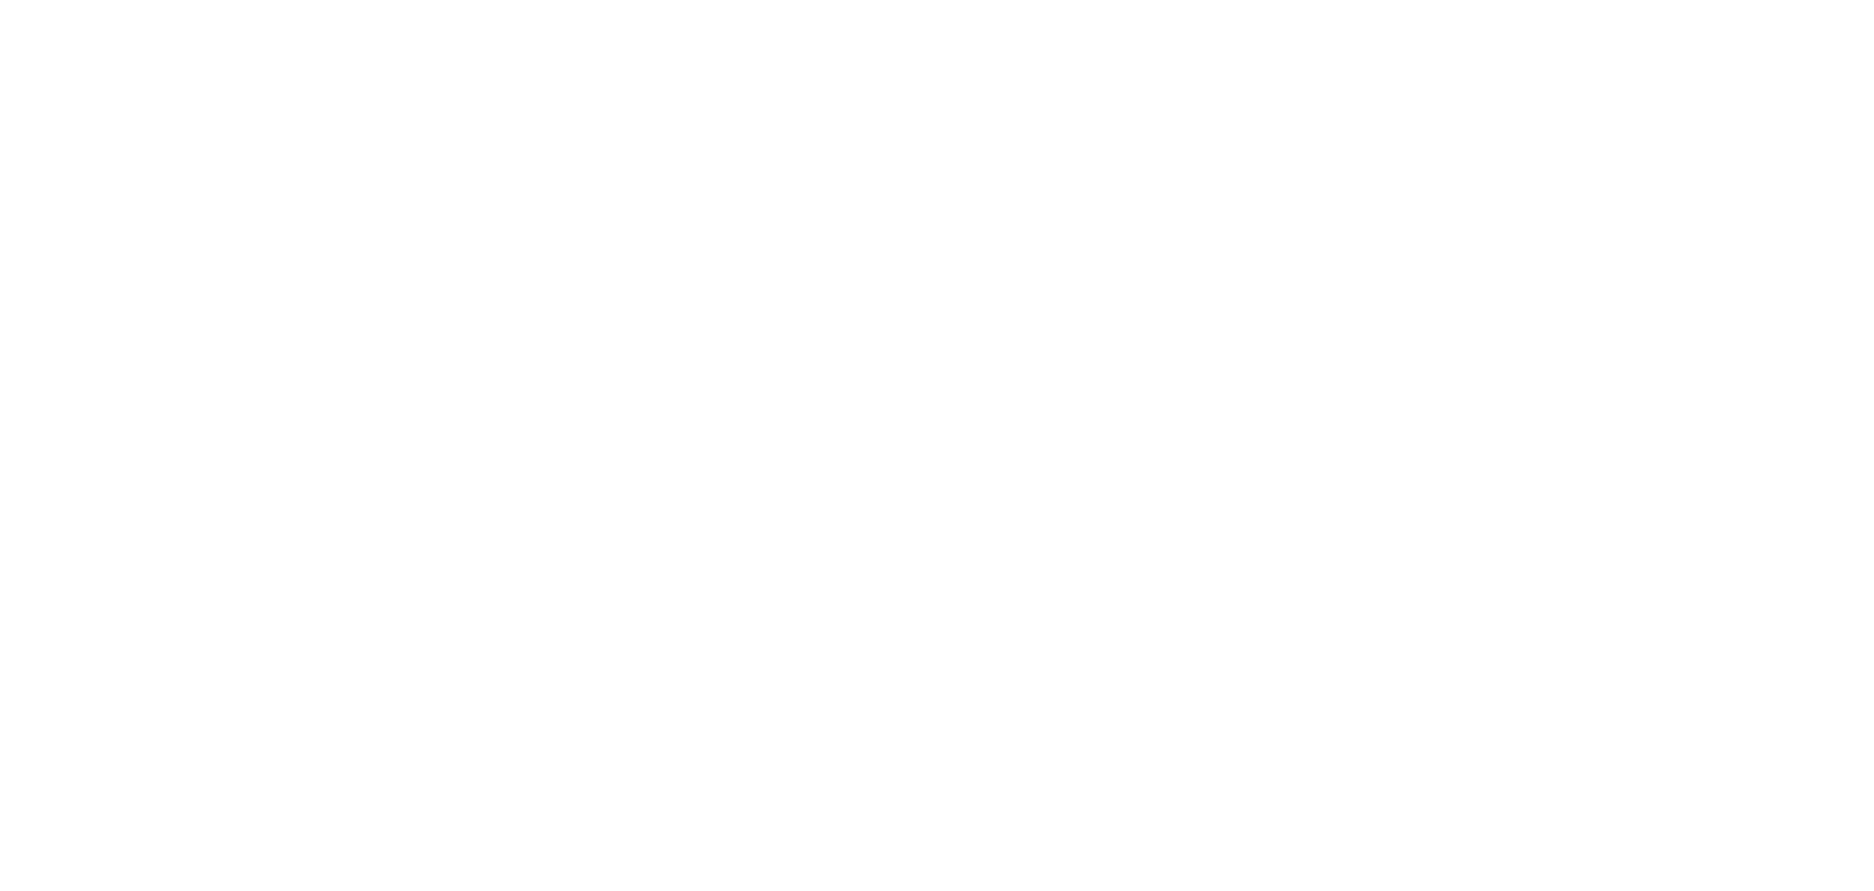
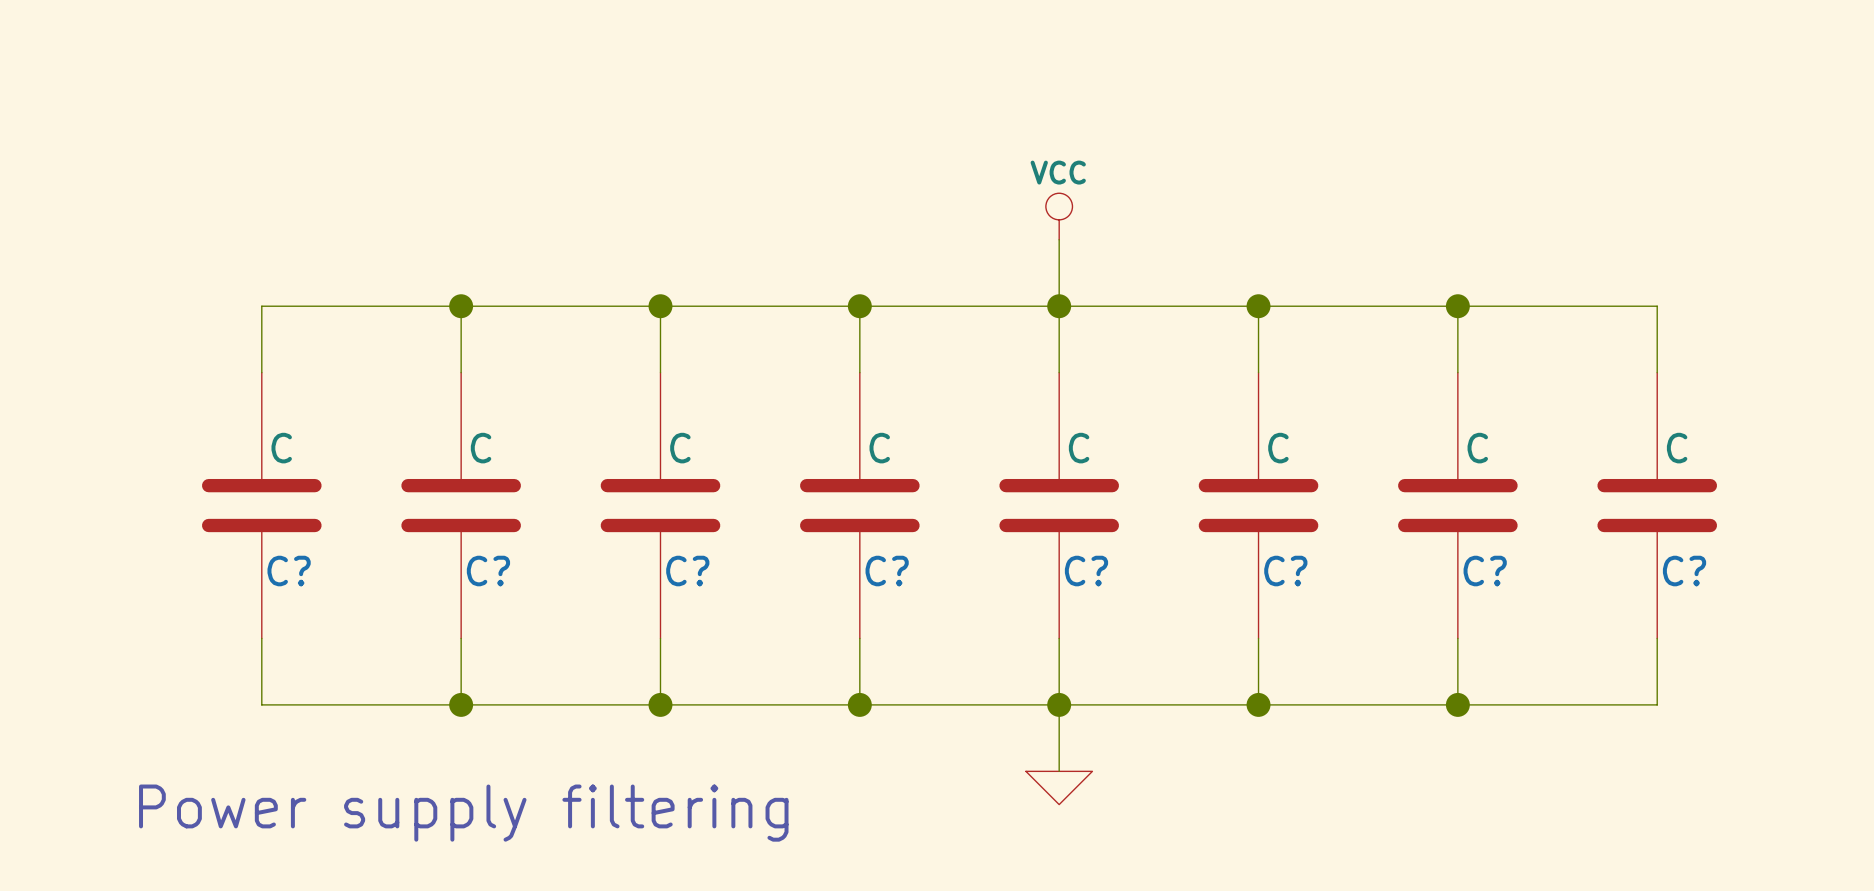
power symbol: none -> VCC (1059, 216)
wire: none -> (1059, 239) (1059, 372)
wire: none -> (461, 306) (461, 372)
junction: none -> (461, 306)
wire: none -> (660, 306) (660, 372)
junction: none -> (660, 306)
wire: none -> (859, 306) (859, 372)
junction: none -> (859, 306)
junction: none -> (1059, 306)
wire: none -> (1258, 306) (1258, 372)
junction: none -> (1258, 306)
wire: none -> (1457, 306) (1457, 372)
junction: none -> (1457, 306)
wire: none -> (261, 372) (261, 306) (1657, 306) (1657, 372)
C?: none -> C (261, 505)
C?: none -> C (461, 505)
C?: none -> C (660, 505)
C?: none -> C (859, 505)
C?: none -> C (1059, 505)
C?: none -> C (1258, 505)
C?: none -> C (1457, 505)
C?: none -> C (1657, 505)
wire: none -> (261, 638) (261, 704) (1657, 704) (1657, 638)
wire: none -> (461, 638) (461, 704)
wire: none -> (660, 638) (660, 704)
wire: none -> (859, 638) (859, 704)
wire: none -> (1059, 638) (1059, 771)
wire: none -> (1258, 638) (1258, 704)
wire: none -> (1457, 638) (1457, 704)
junction: none -> (461, 704)
junction: none -> (660, 704)
junction: none -> (859, 704)
junction: none -> (1059, 704)
junction: none -> (1258, 704)
junction: none -> (1457, 704)
power symbol: none -> (1059, 787)
text: none -> Power supply filtering (463, 813)

